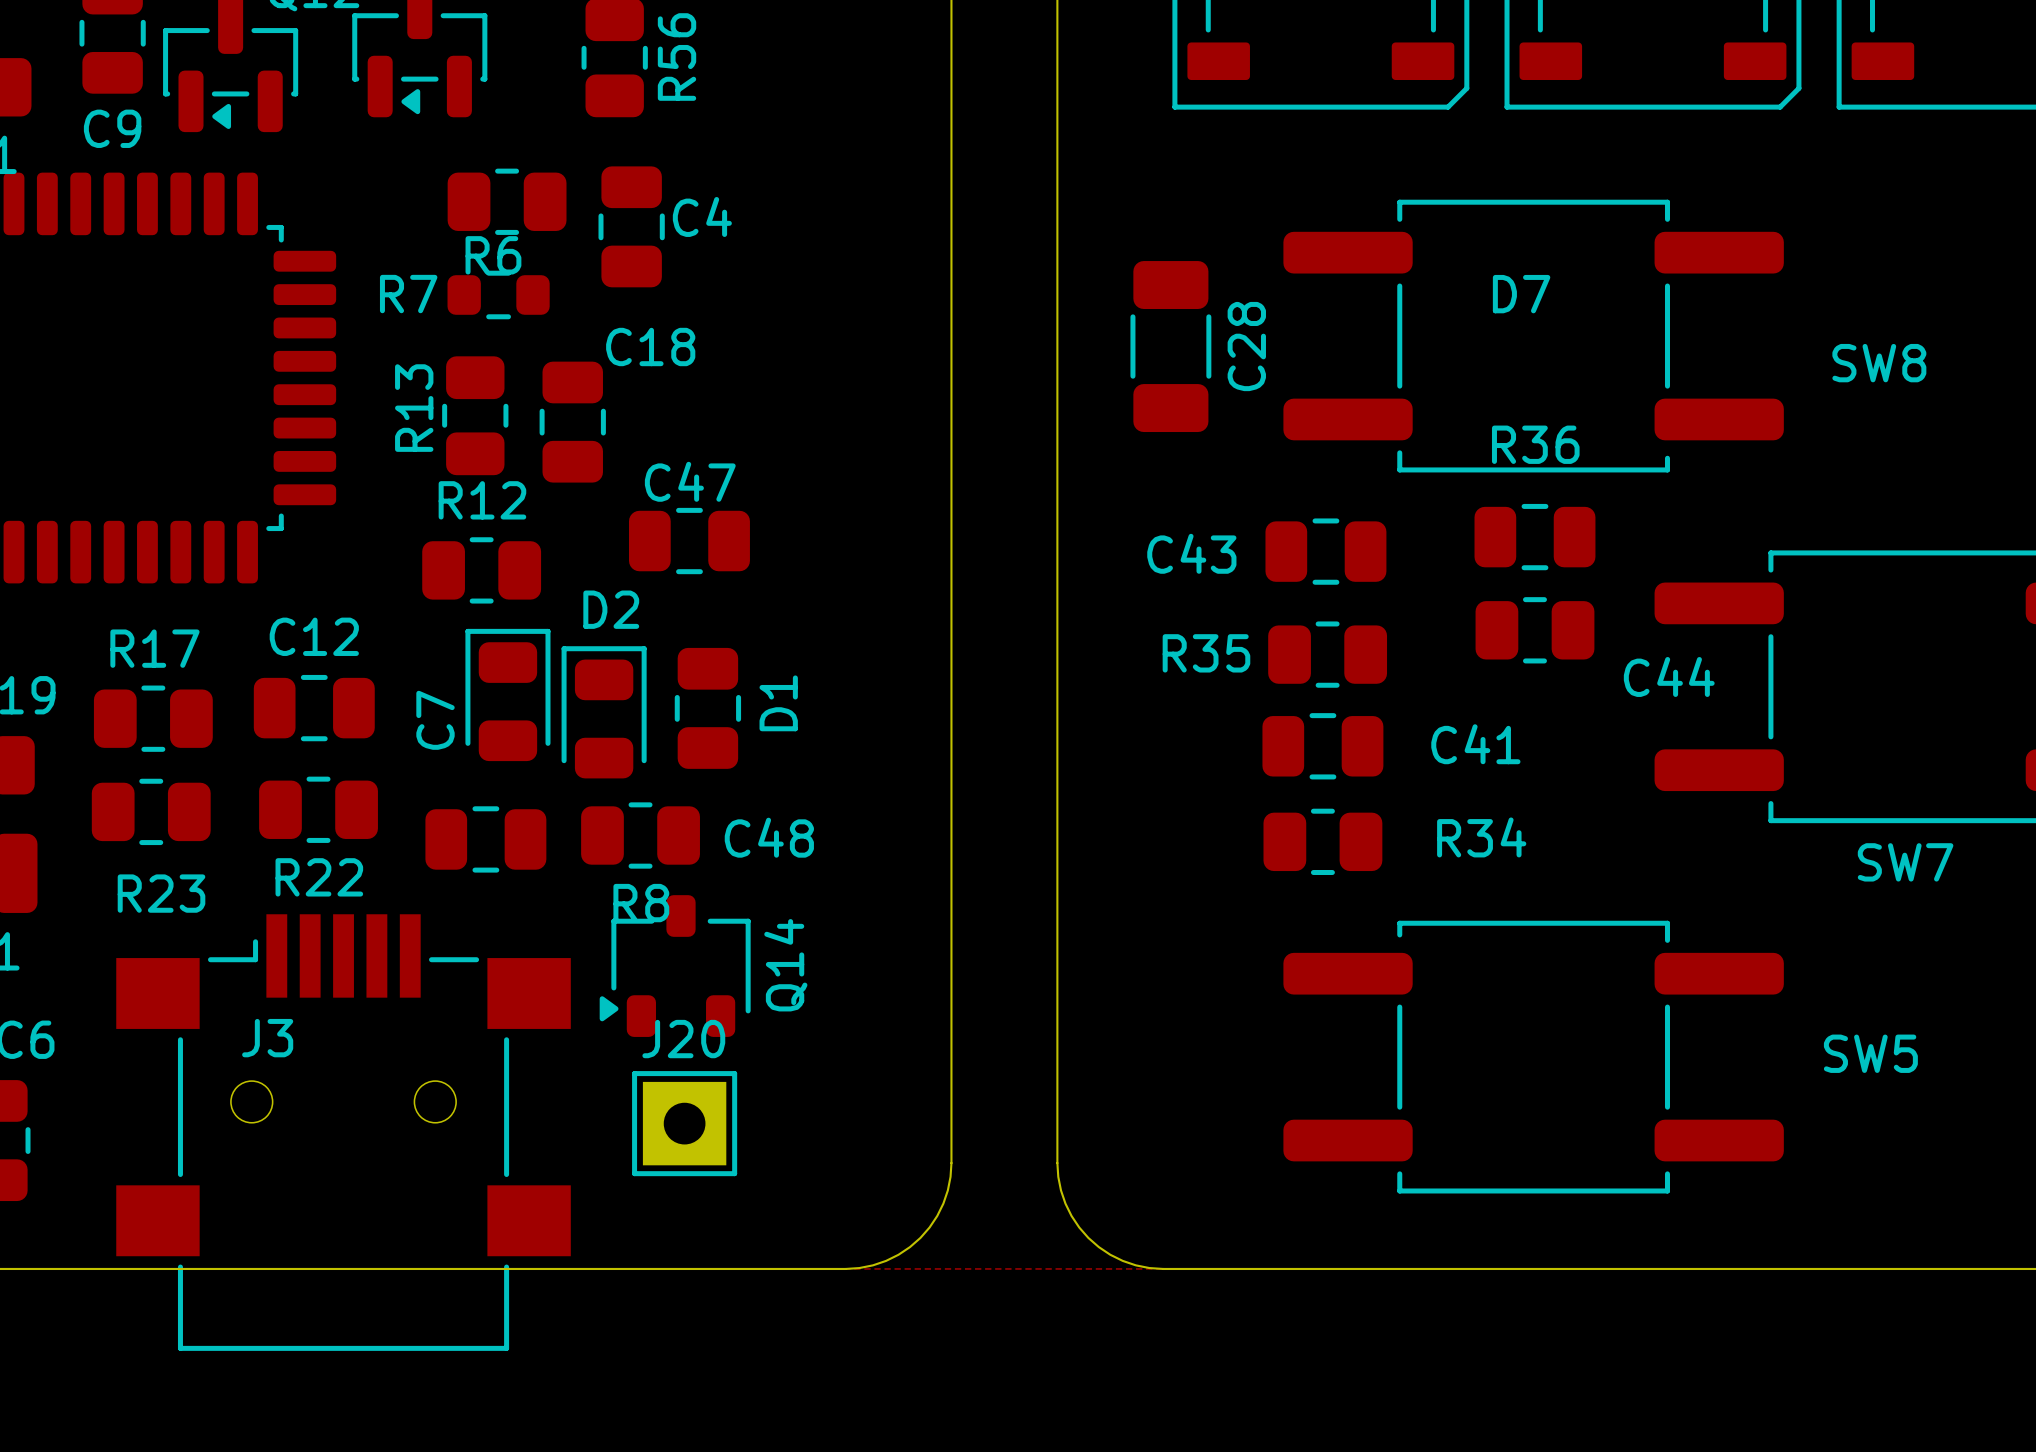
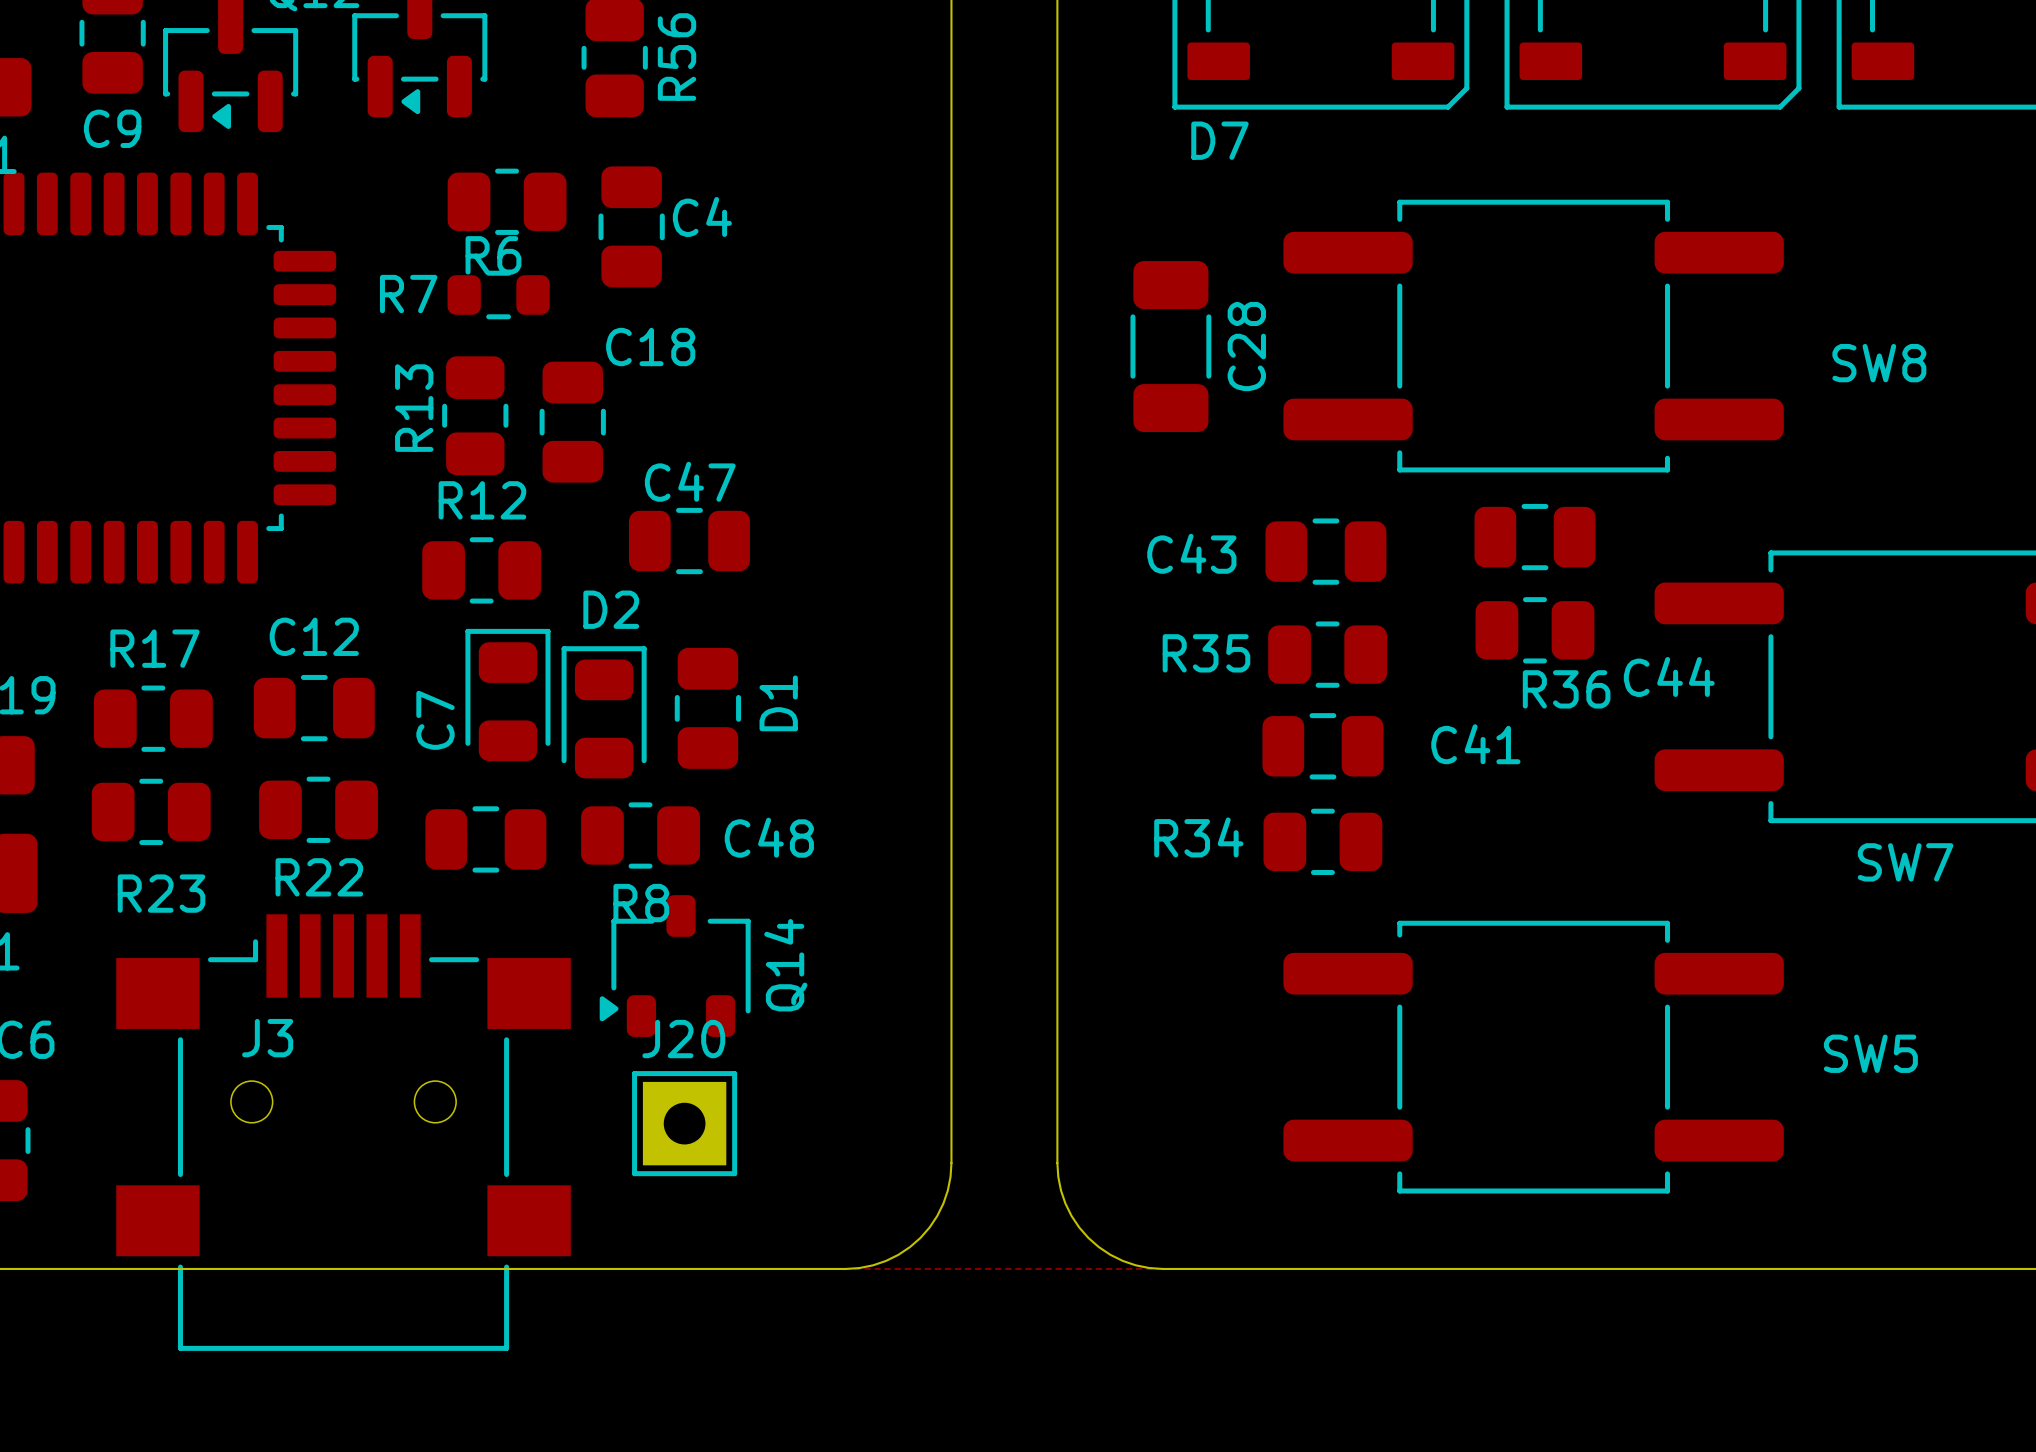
D7 name position: D7 (1521, 294) -> D7 (1219, 140)
R36 name position: R36 (1535, 444) -> R36 (1566, 689)
R34 name position: R34 (1481, 837) -> R34 (1198, 837)

